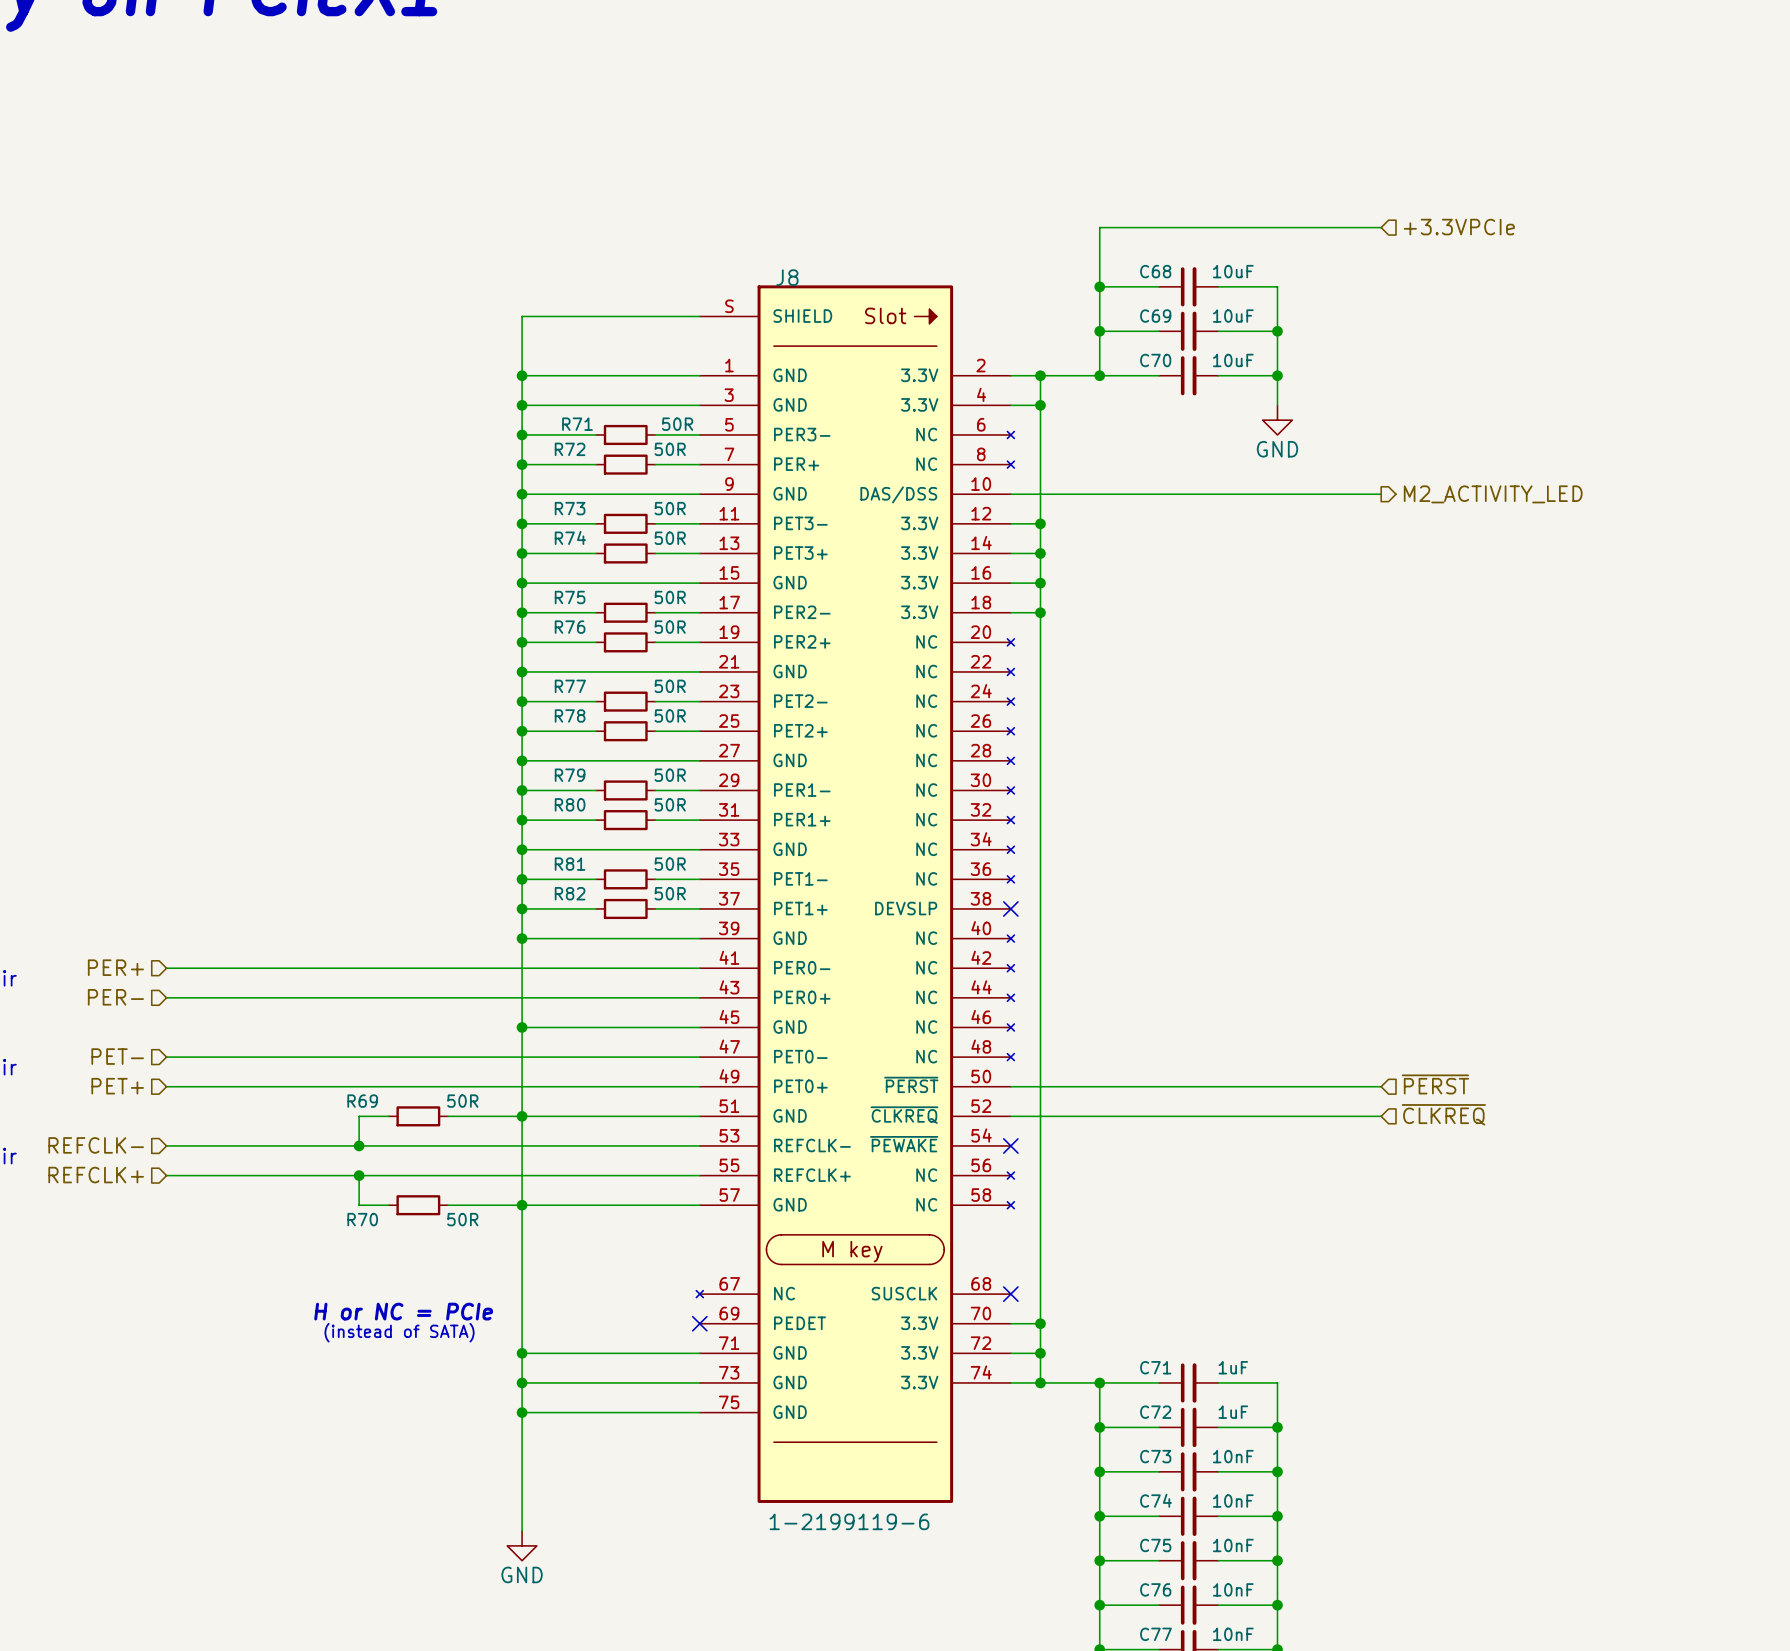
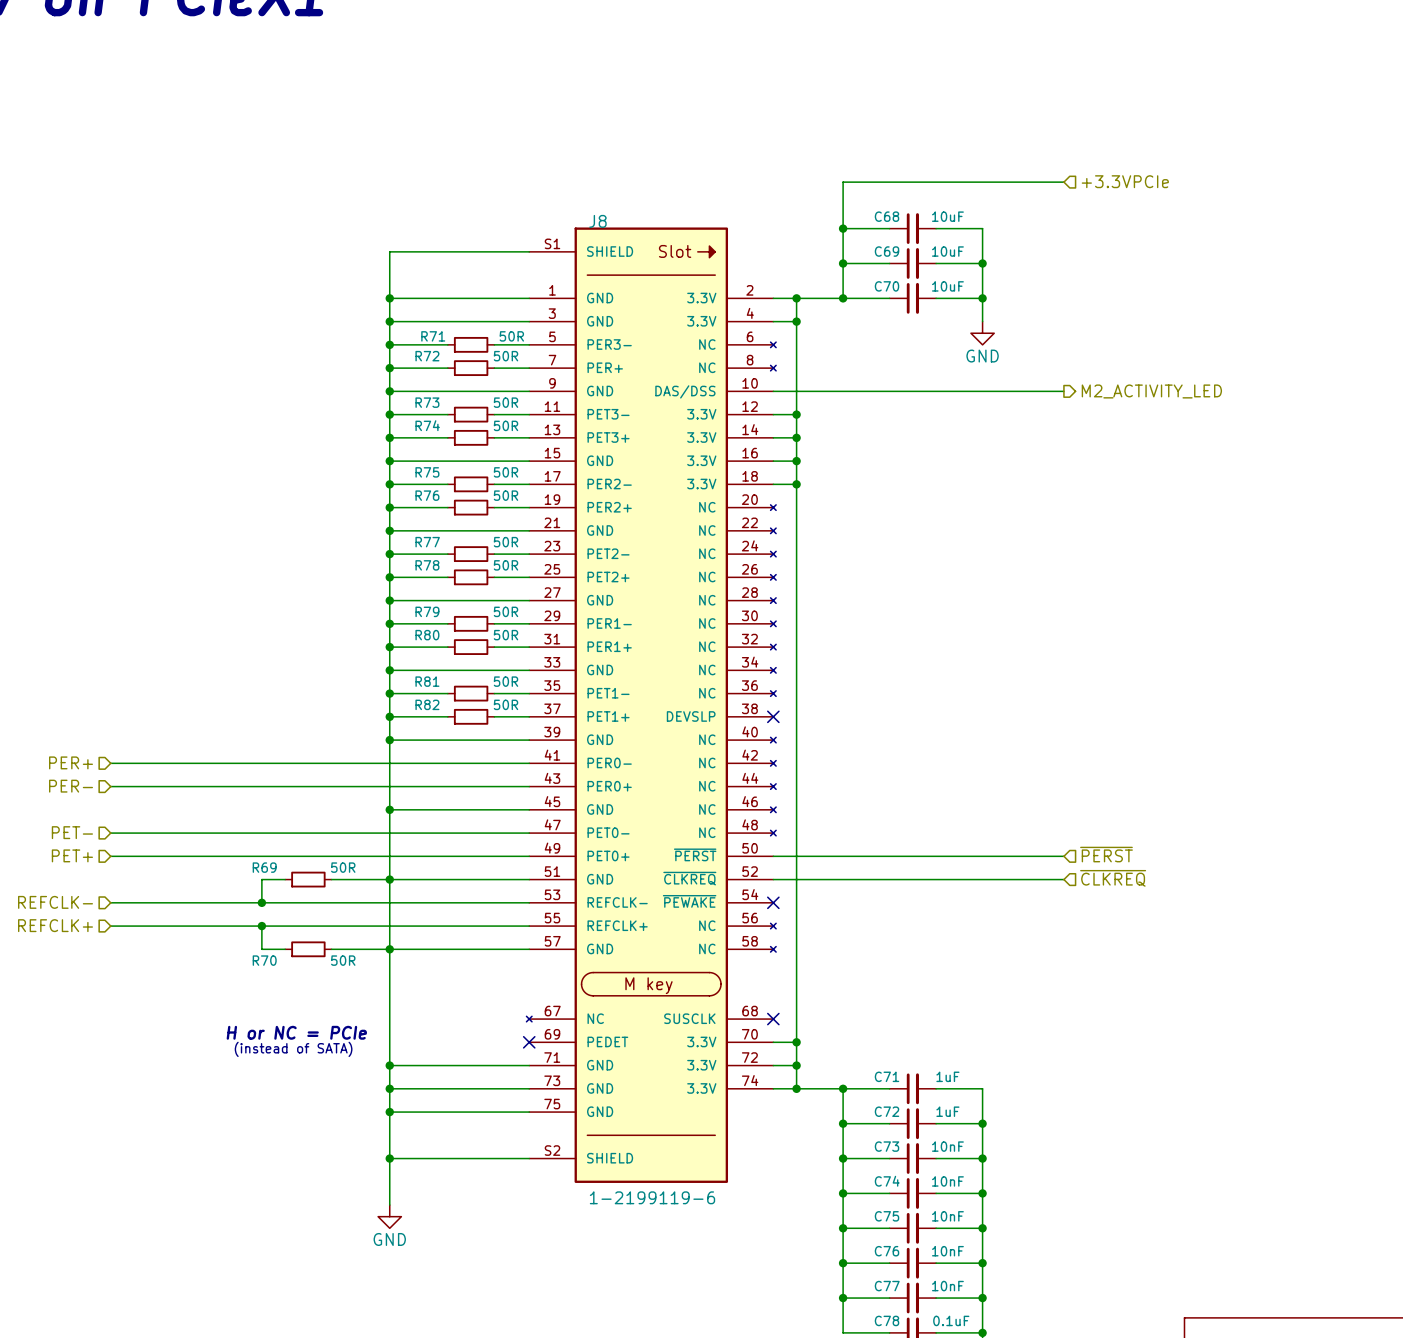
J8 symbol: [696, 285, 1015, 1503] -> [526, 227, 777, 1183]
wire: none -> (389, 1158) (529, 1158)
junction: none -> (389, 1158)

